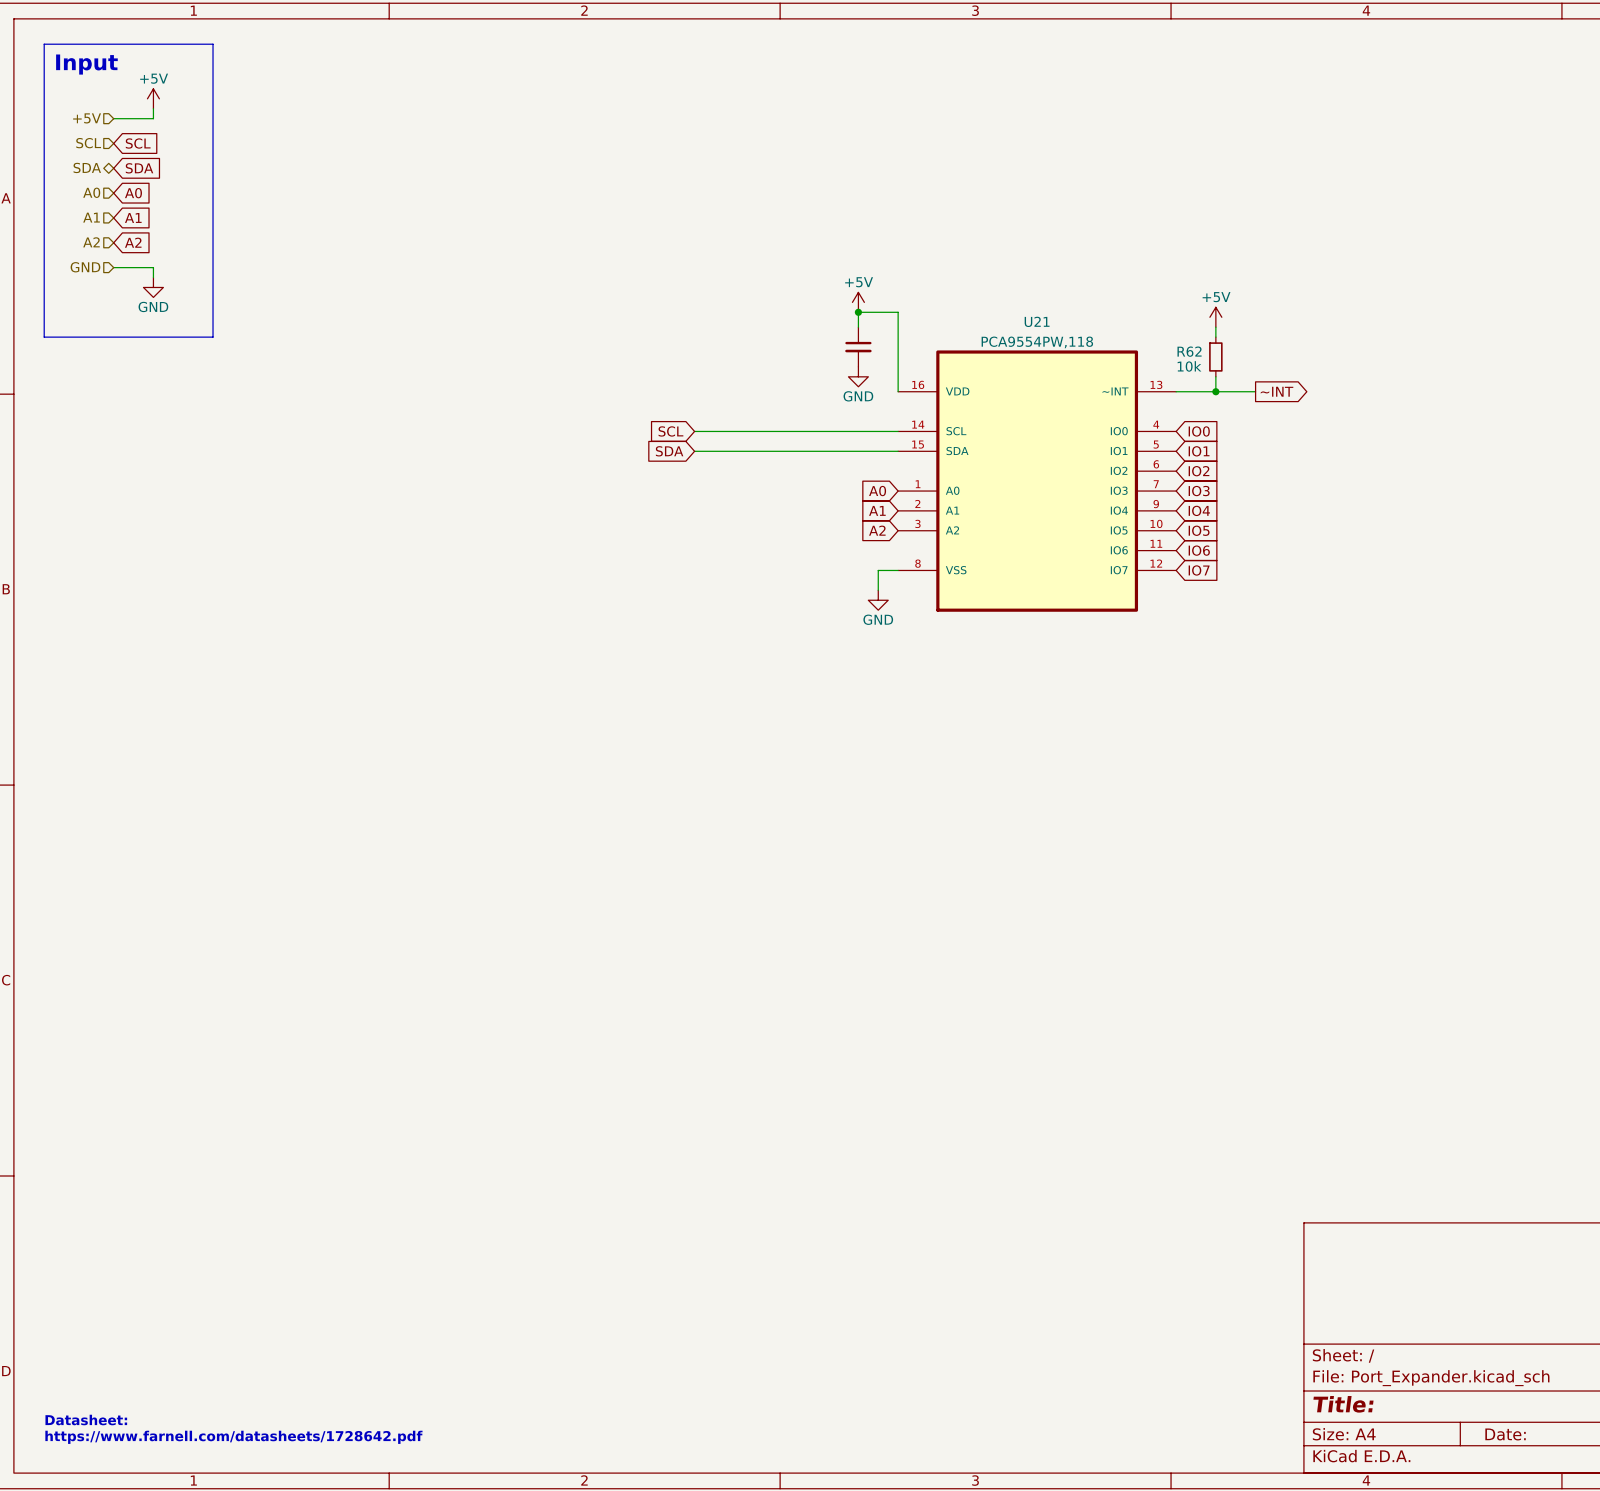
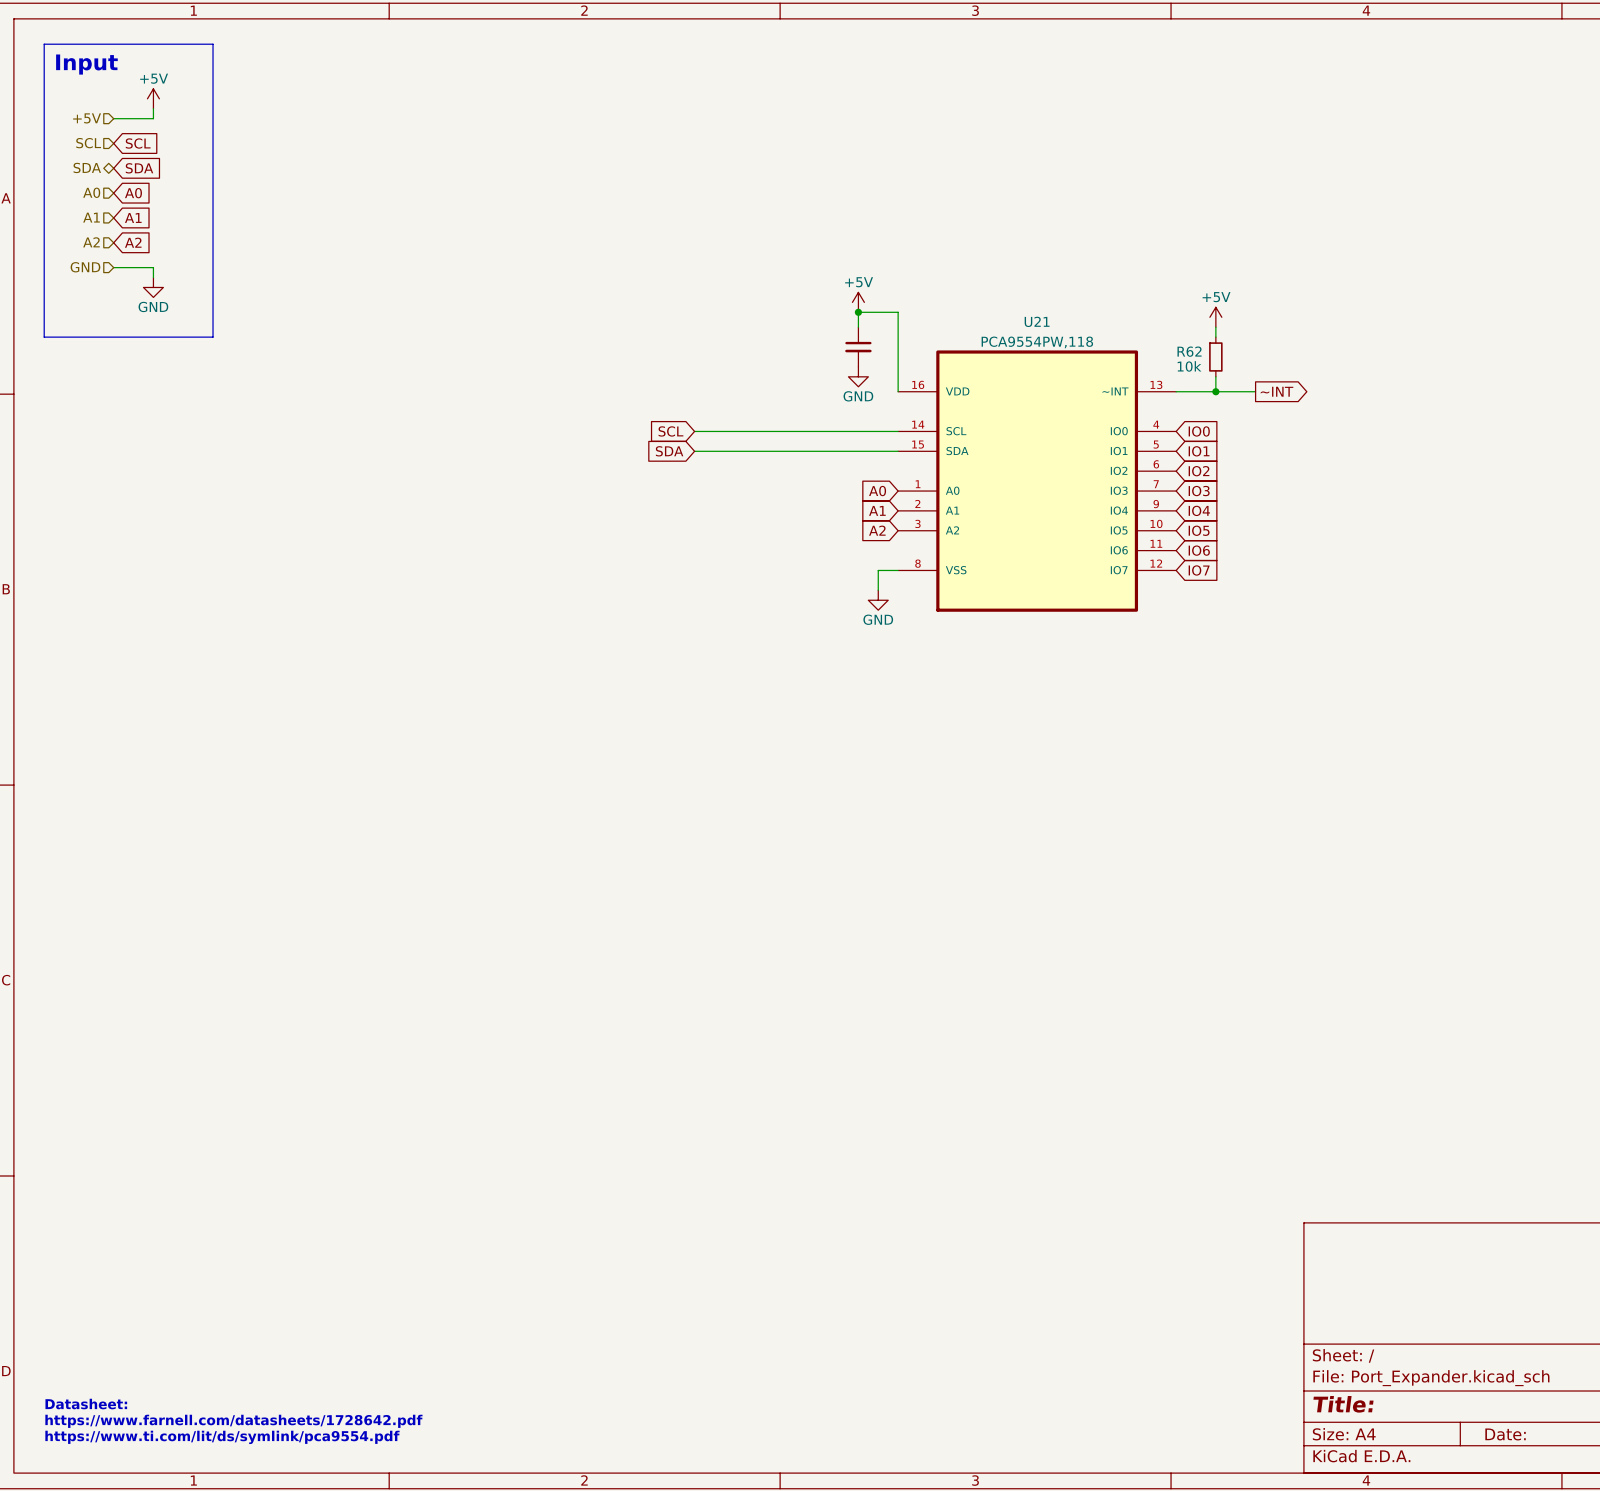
text: none -> Datasheet: (86, 1404)
text: Datasheet: (86, 1420) -> https://www.farnell.com/datasheets/1728642.pdf (233, 1421)
text: https://www.farnell.com/datasheets/1728642.pdf (233, 1437) -> https://www.ti.com/lit/ds/symlink/pca9554.pdf (222, 1437)

